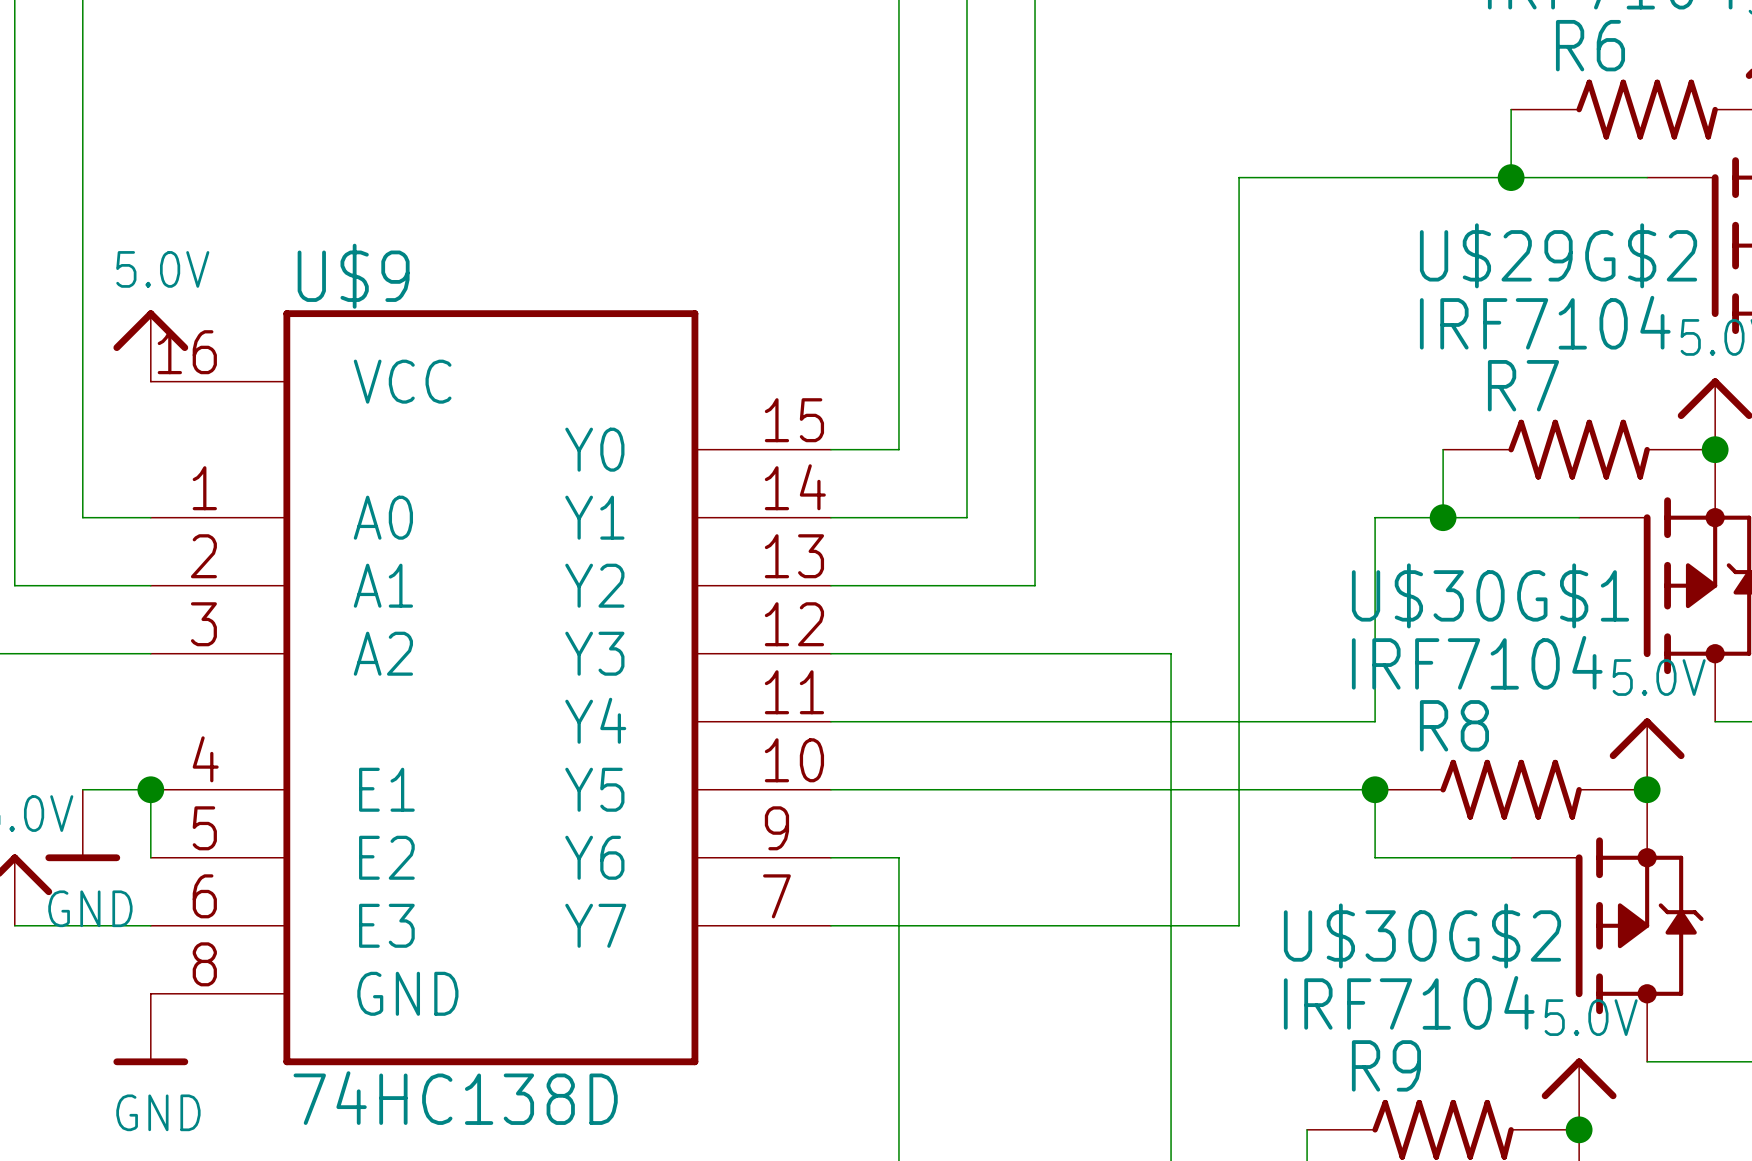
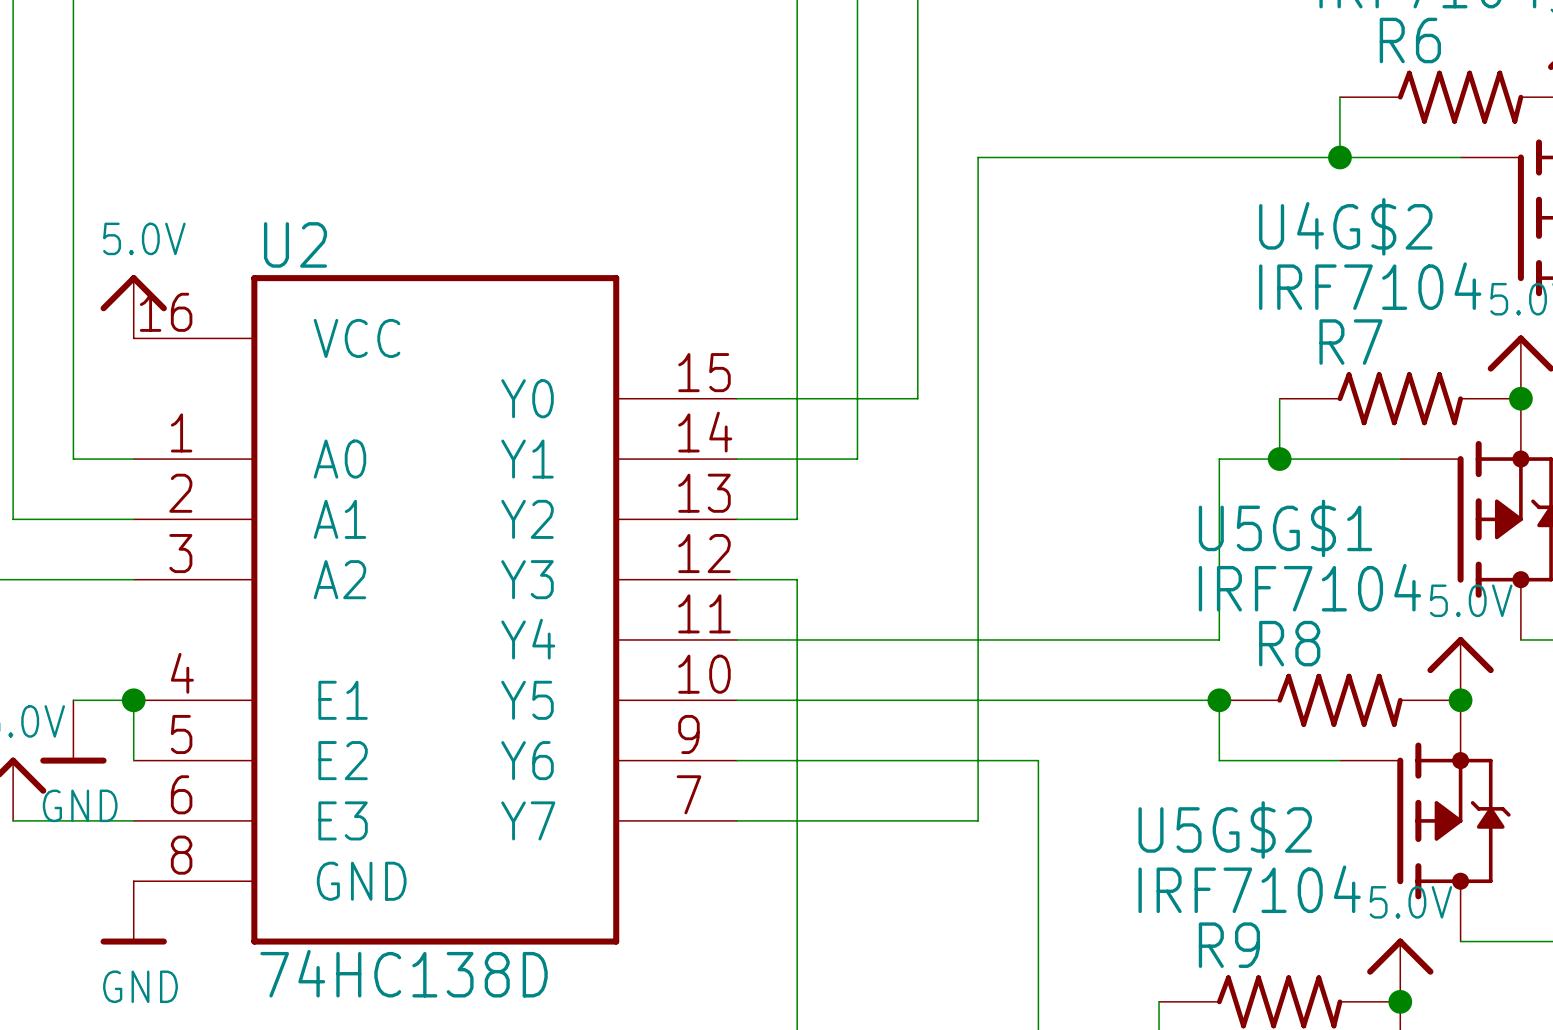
wire: (1239, 177) (1239, 925) (1103, 925) -> (1098, 157) (978, 157) (978, 820)
U$29G$2 name: U$29G$2 (1558, 255) -> U4G$2 (1345, 226)
U$9 name: U$9 (353, 276) -> U2 (295, 244)
wire: (1035, 449) (1035, 585) (898, 585) -> (917, 398) (797, 398) (797, 519)
U$30G$1 name: U$30G$1 (1490, 595) -> U5G$1 (1285, 528)
wire: (898, 653) (1171, 653) (1171, 857) -> (797, 579) (797, 760) (1038, 760)
U$30G$2 name: U$30G$2 (1422, 935) -> U5G$2 (1225, 829)

